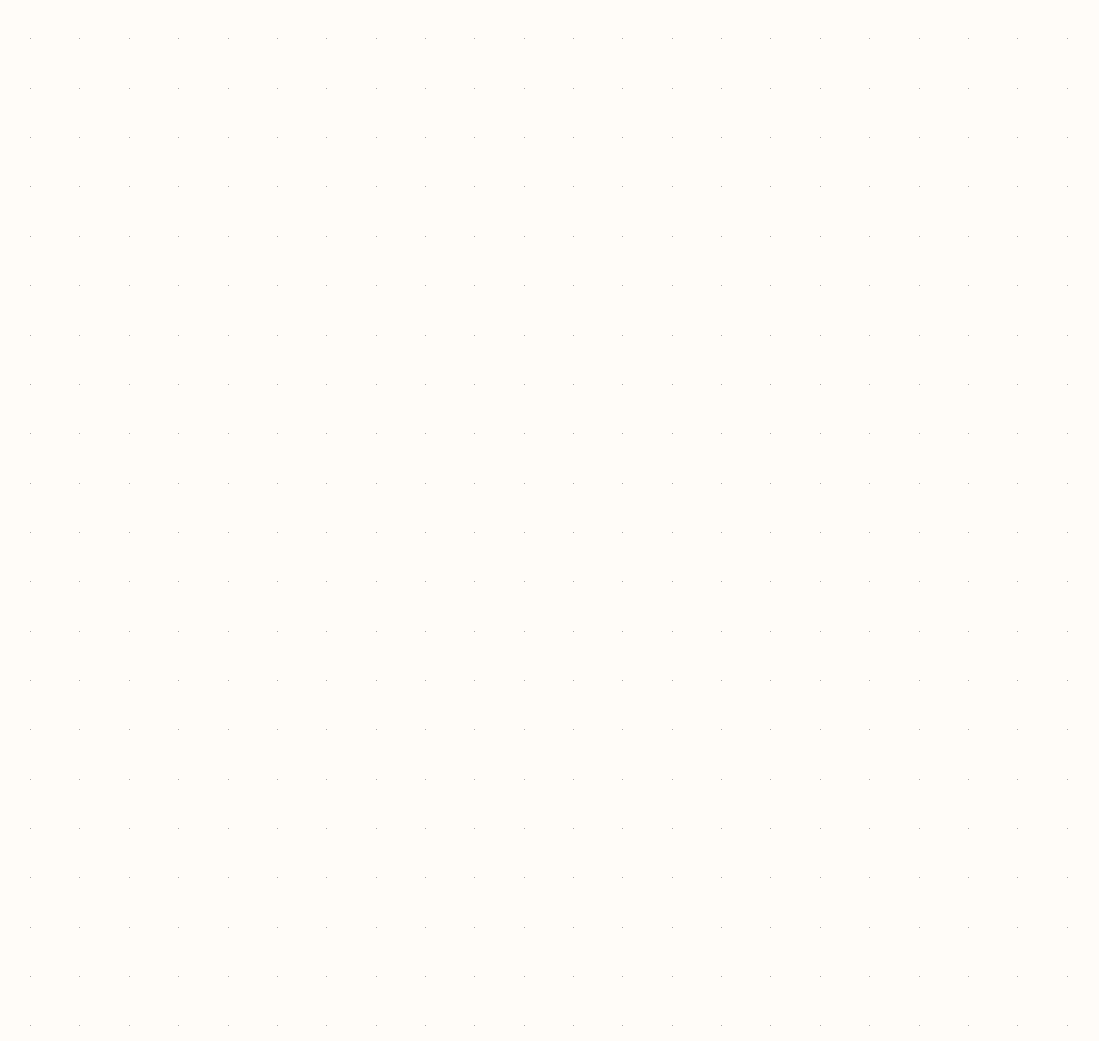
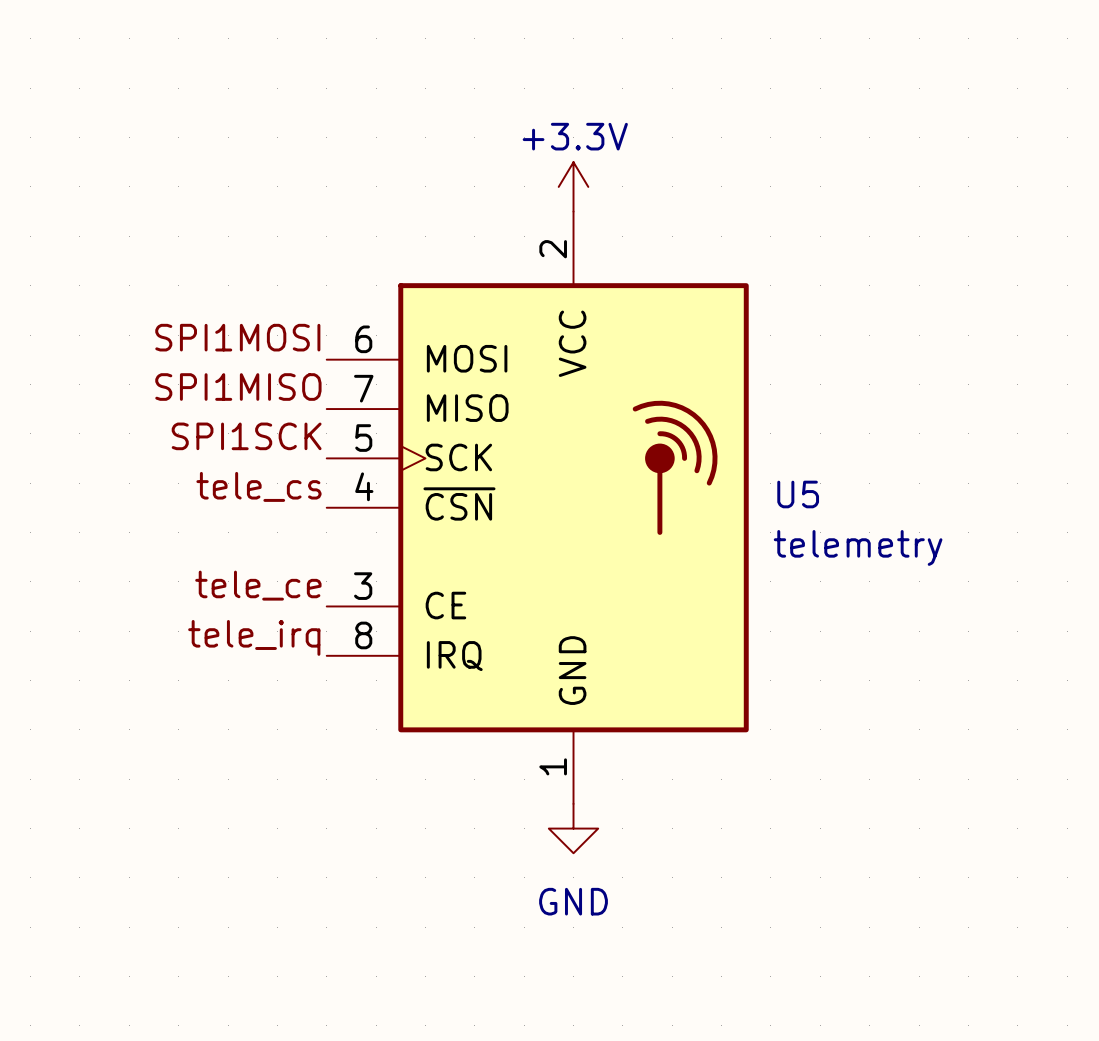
power symbol: none -> +3.3V (573, 186)
label: none -> SPI1MOSI (237, 337)
label: none -> SPI1MISO (238, 387)
label: none -> SPI1SCK (246, 436)
label: none -> tele_cs (258, 486)
U5: none -> telemetry (537, 507)
label: none -> tele_ce (258, 585)
label: none -> tele_irq (254, 637)
power symbol: none -> GND (573, 828)

